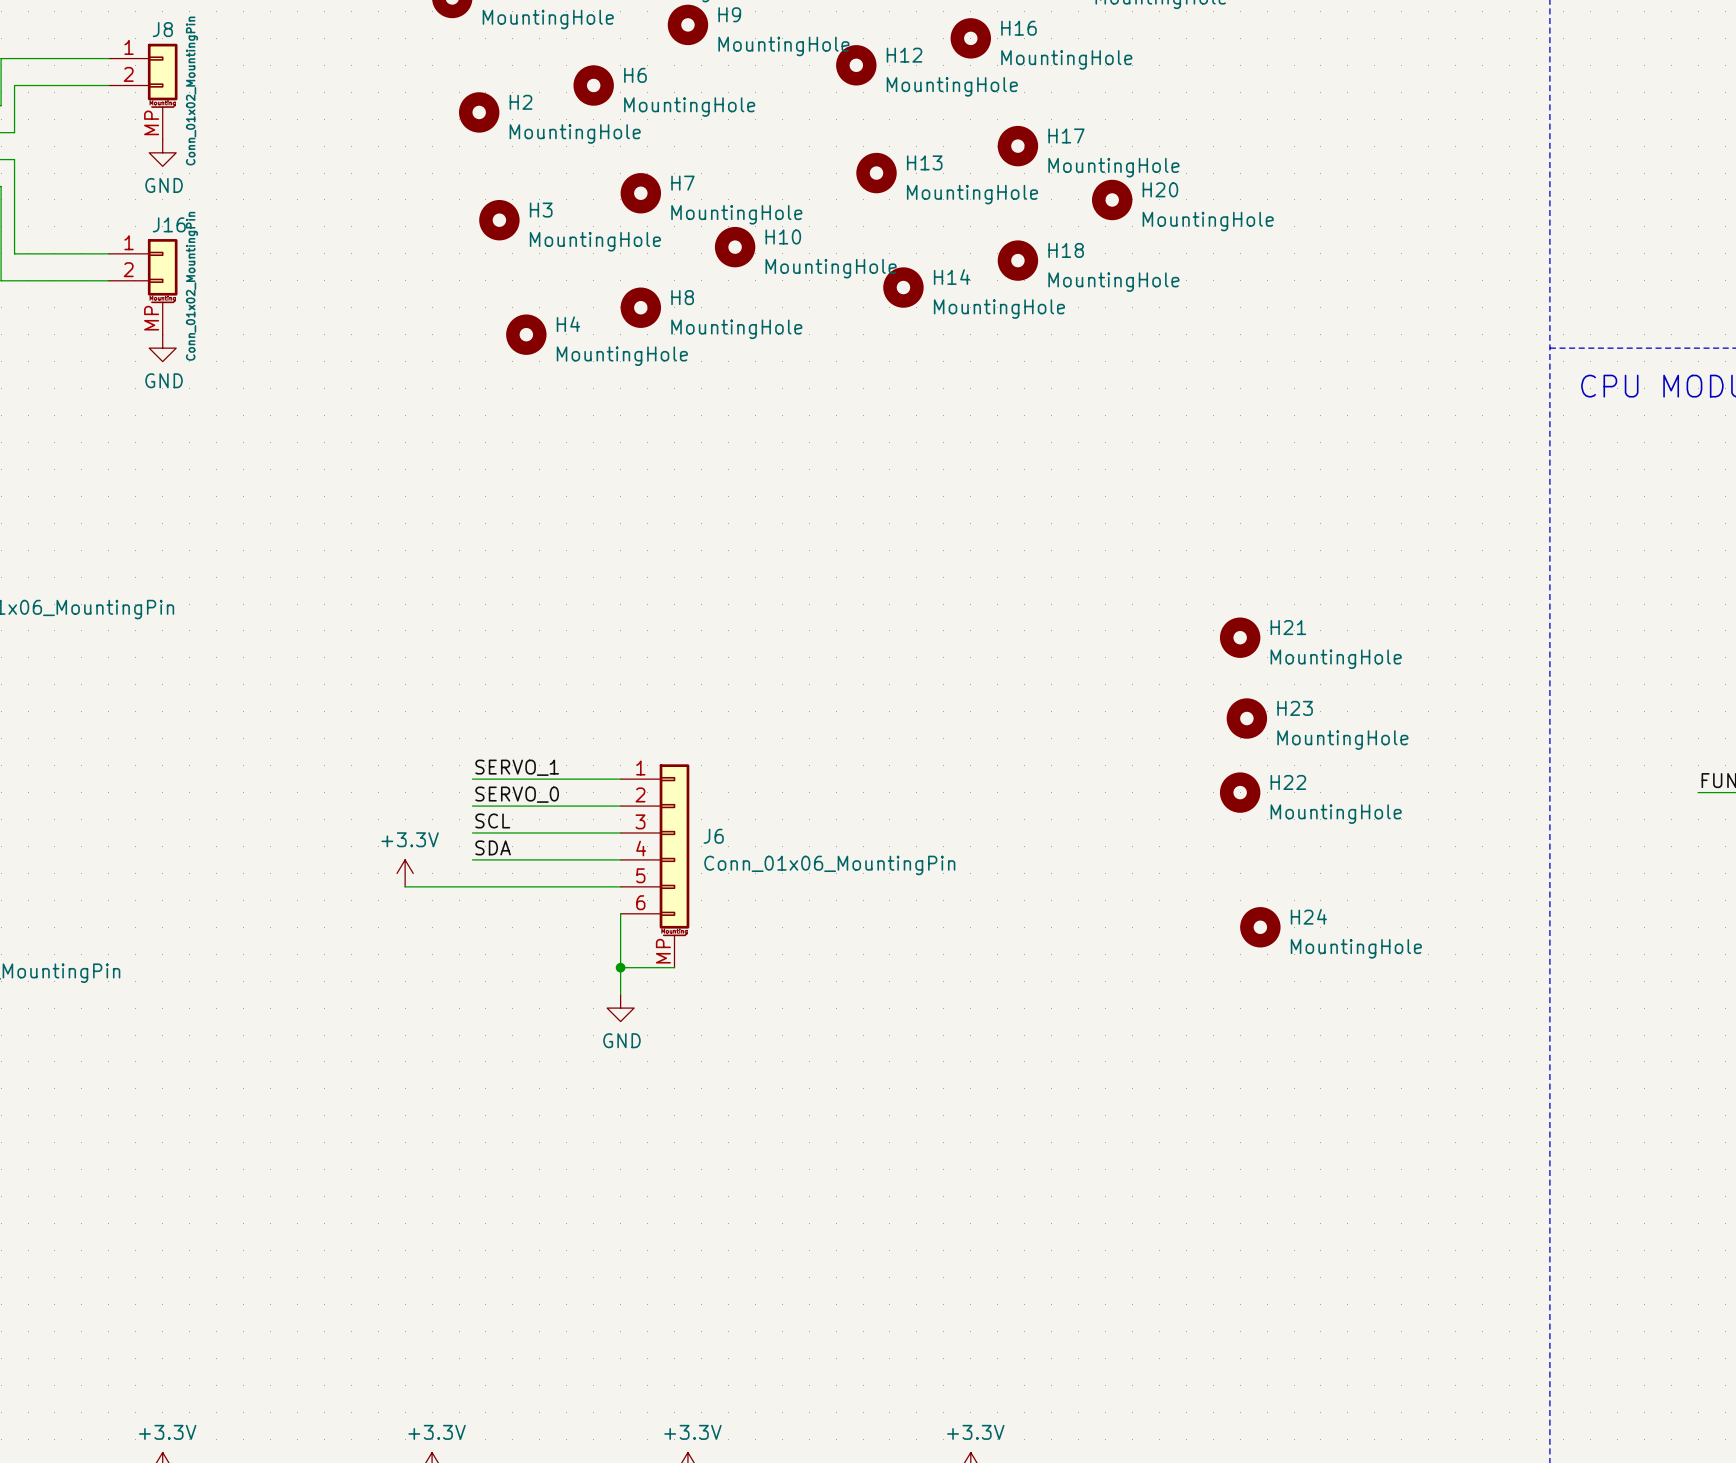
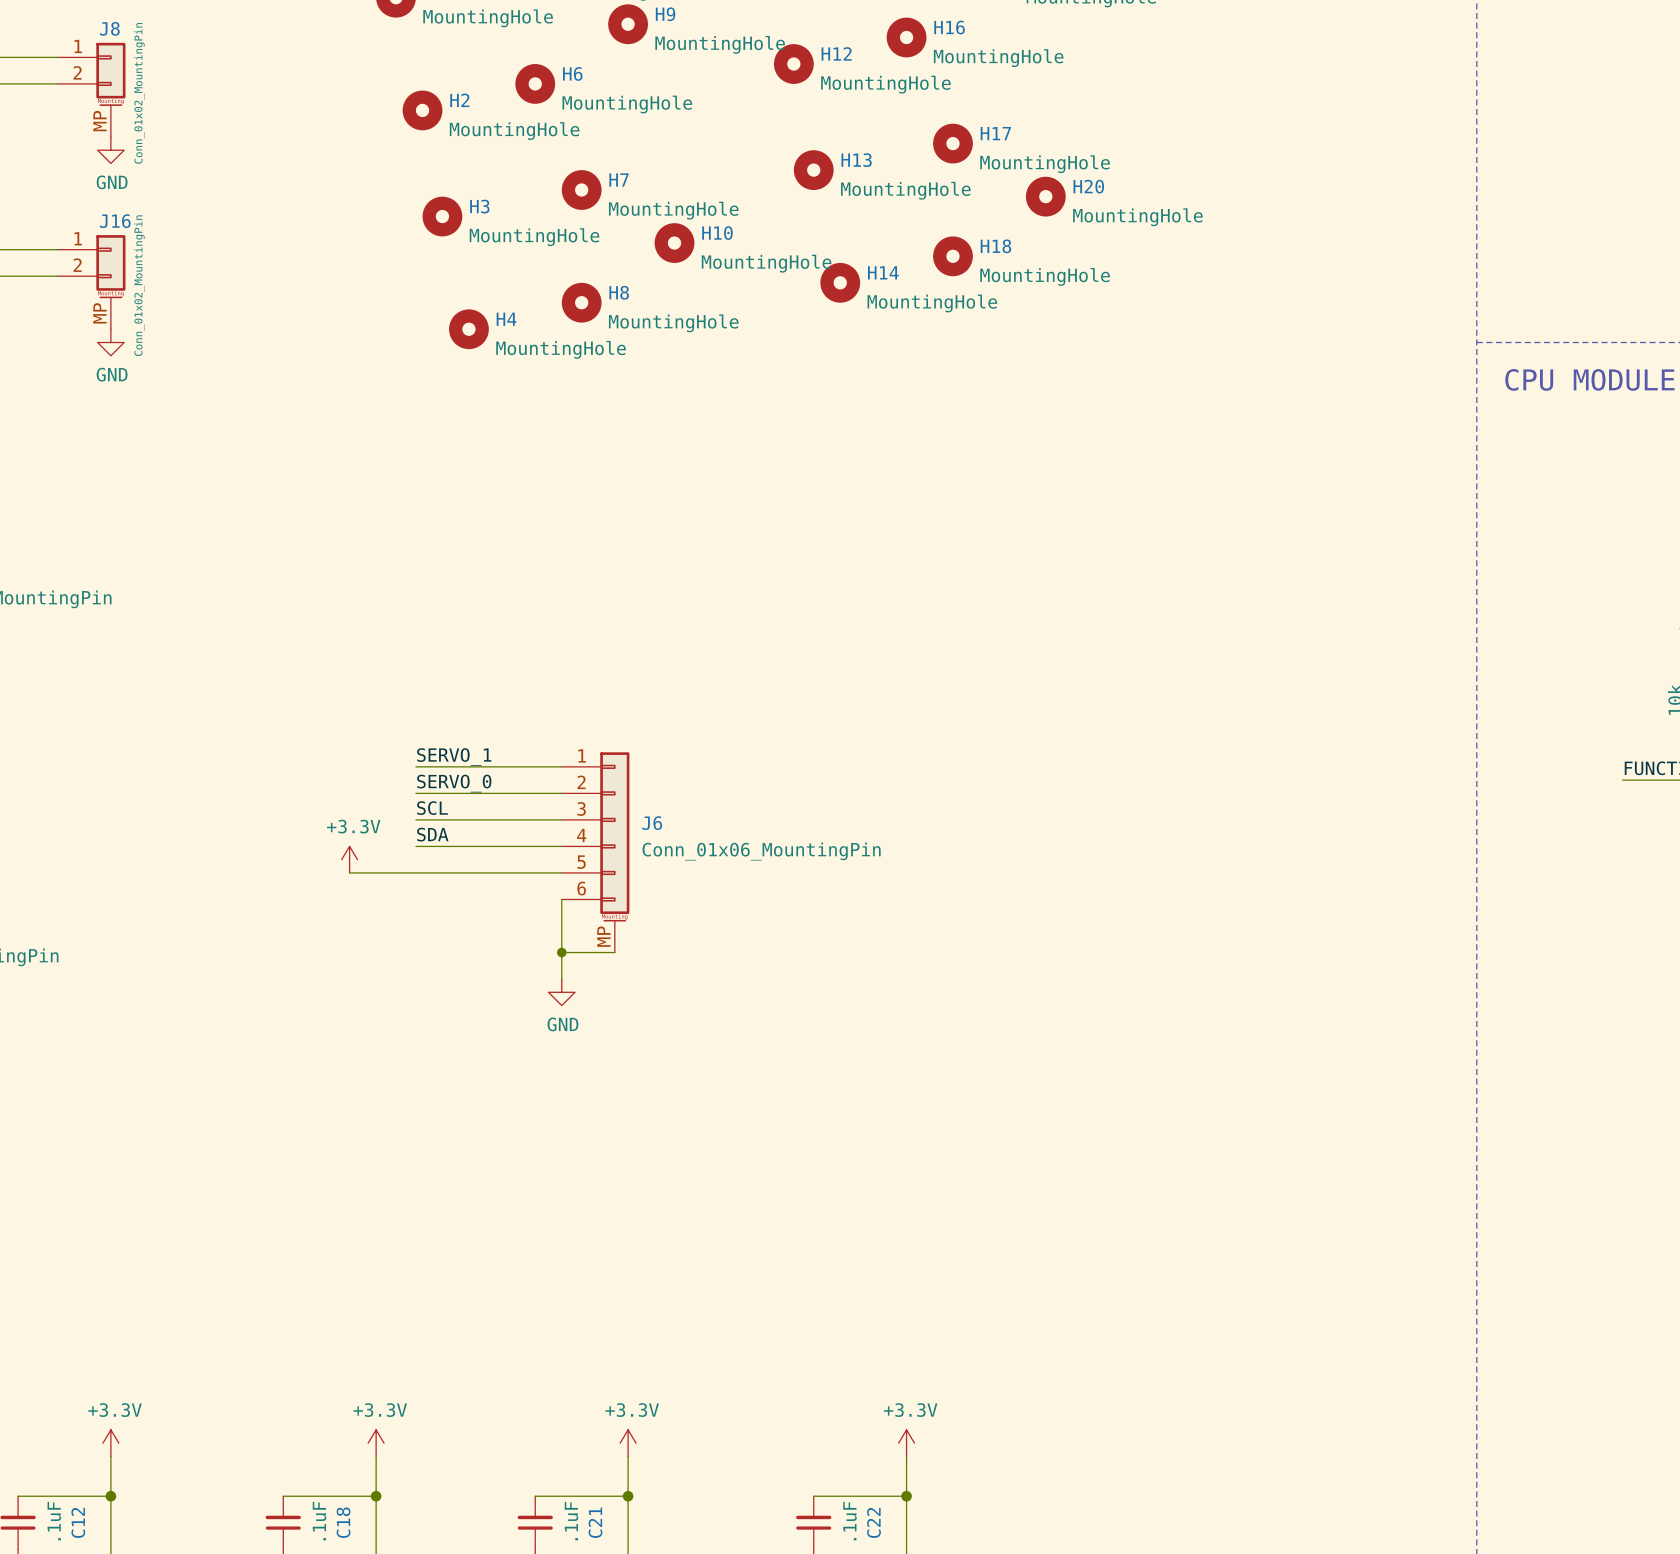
H21: MountingHole (1240, 637) -> none
H23: MountingHole (1246, 718) -> none
H22: MountingHole (1240, 792) -> none
H24: MountingHole (1260, 927) -> none

